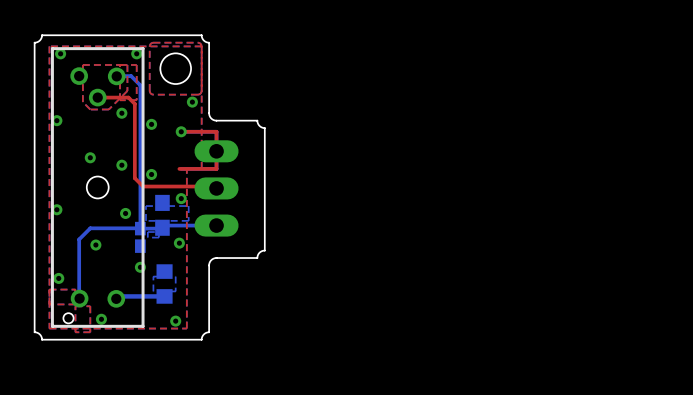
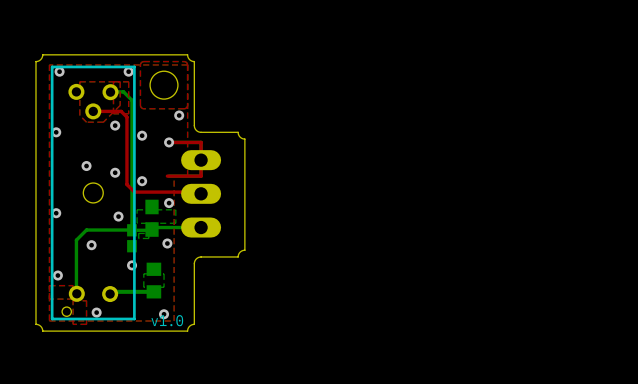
text: none -> v1.0 (167, 320)

